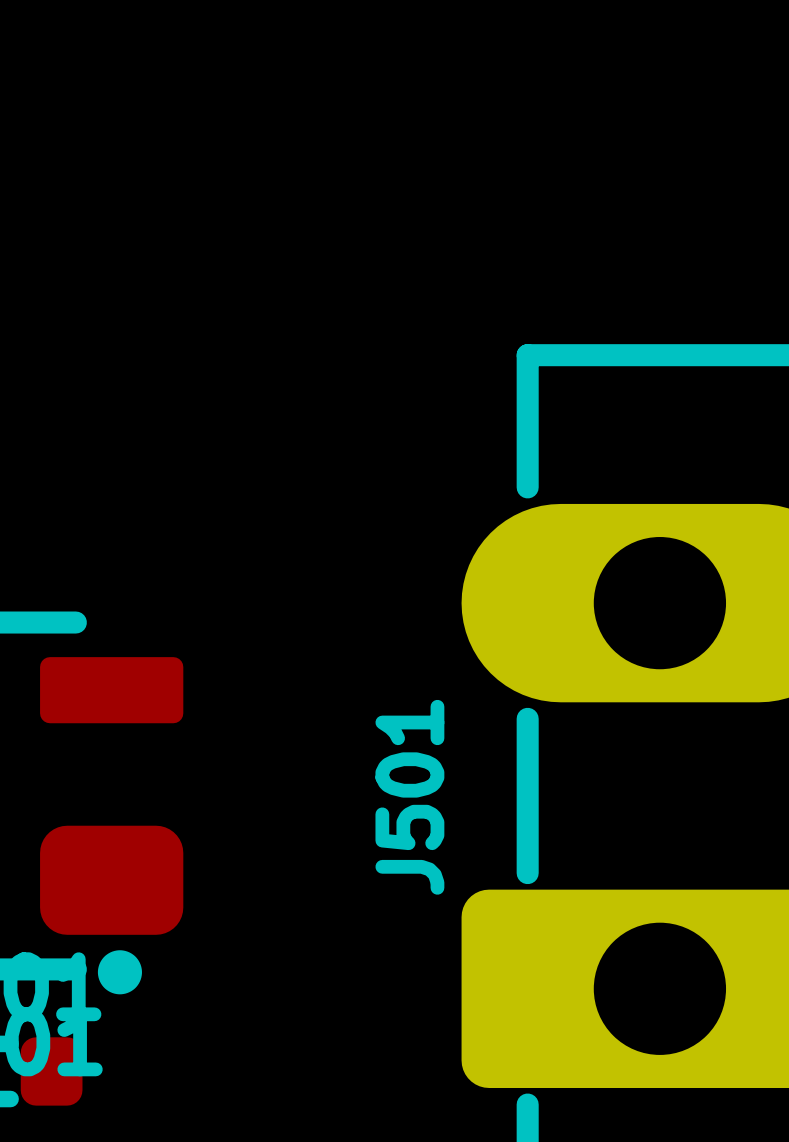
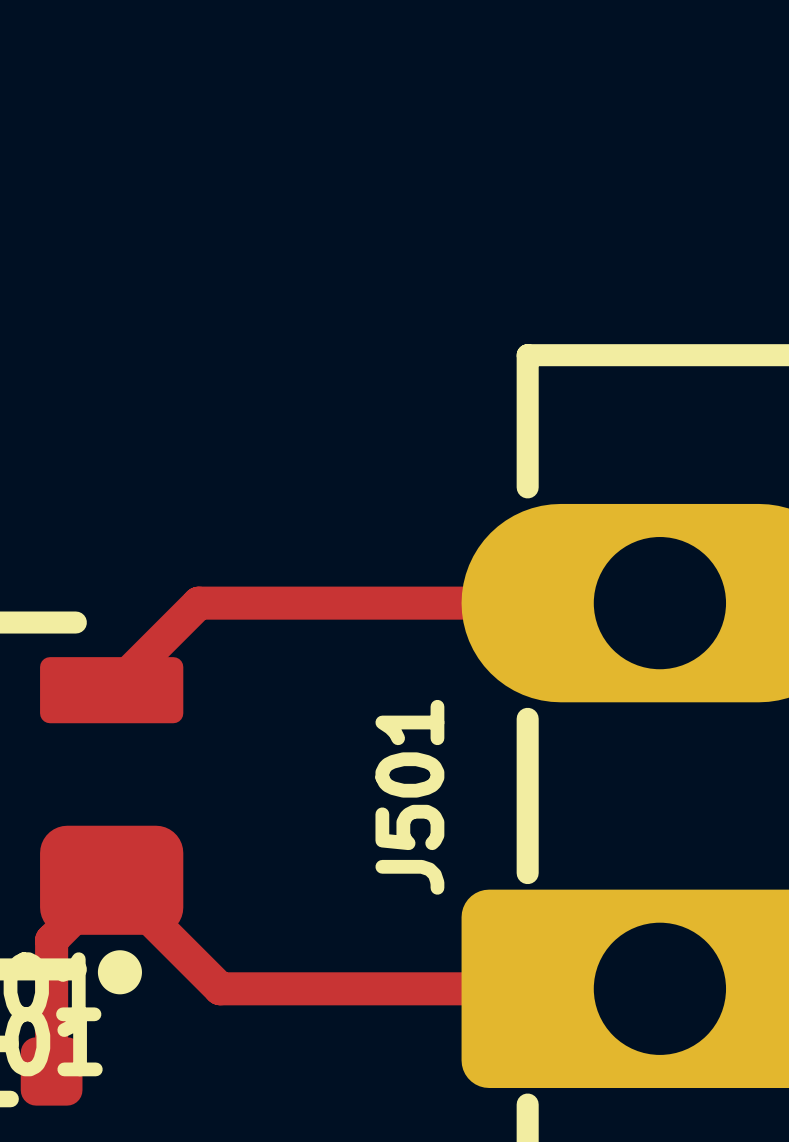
track: none -> (659, 603) (198, 603) (111, 690)
track: none -> (659, 988) (220, 988) (111, 880) (51, 940) (51, 1071)

